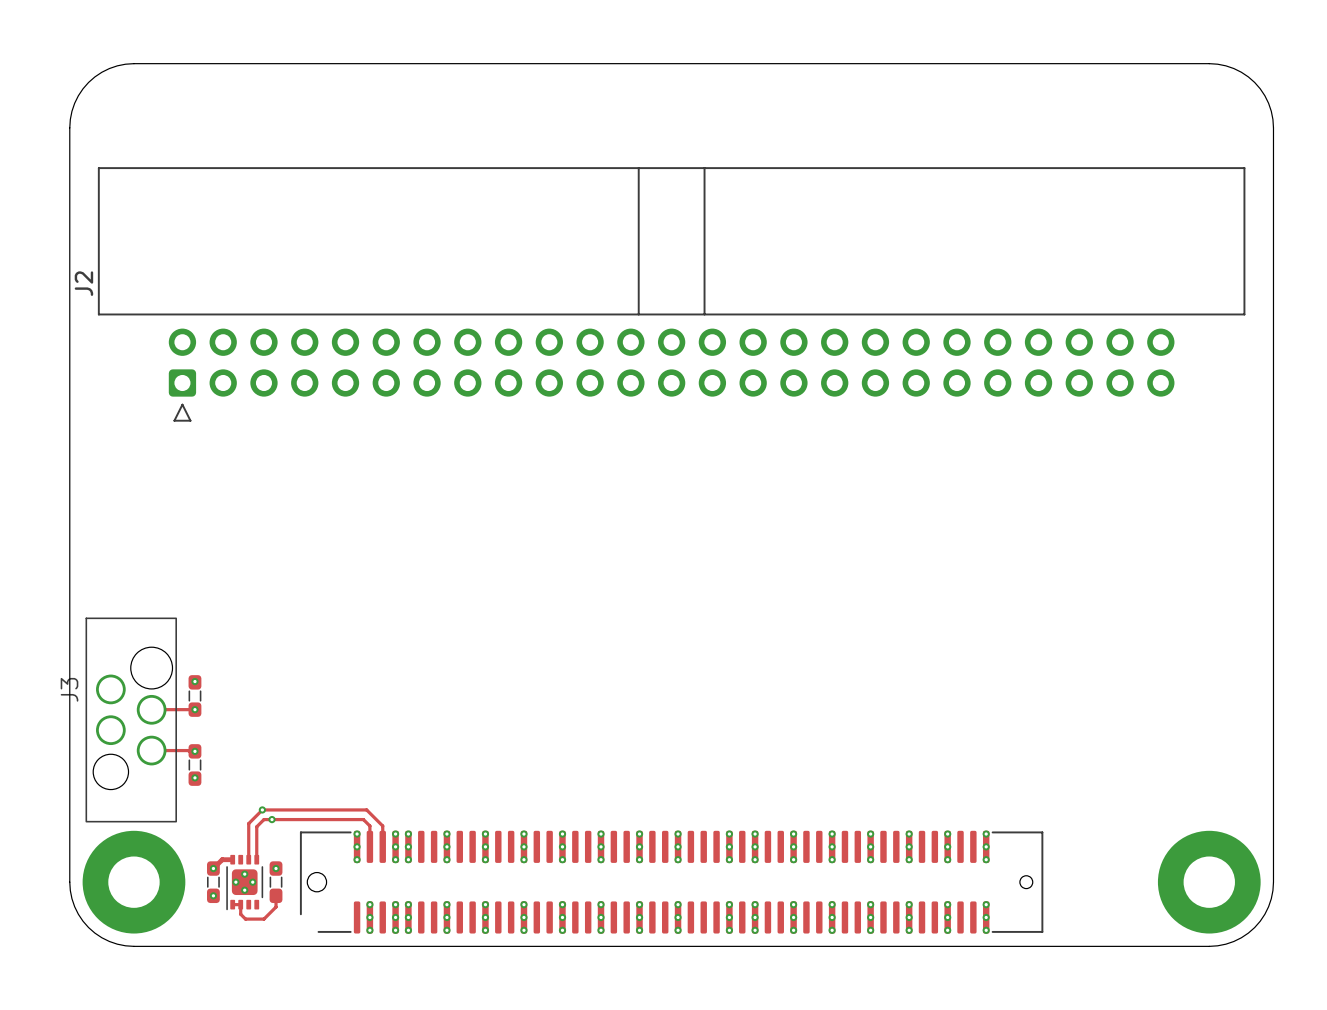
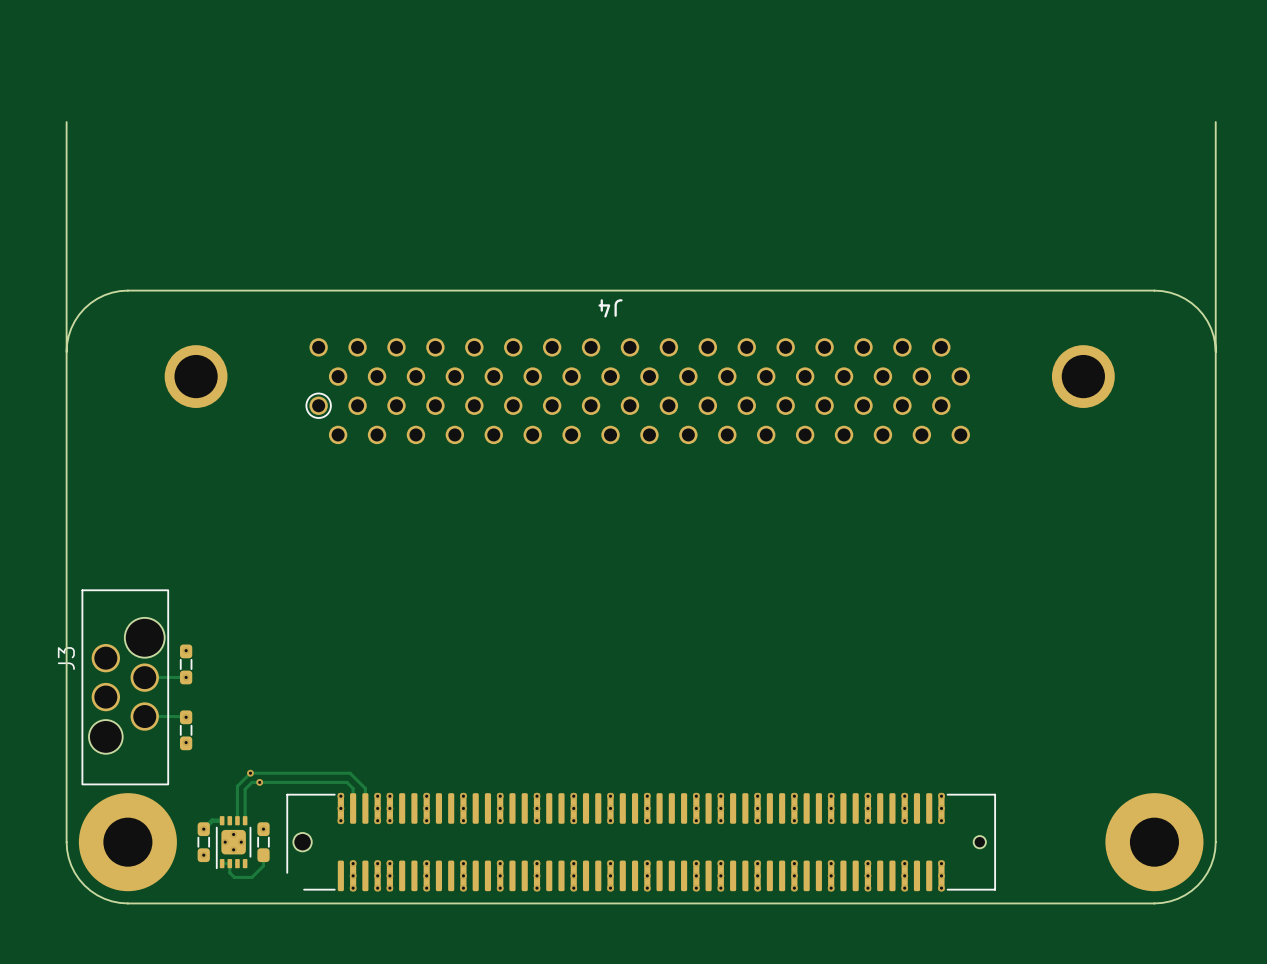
board edge: (69, 127) (74, 103) (88, 82) (109, 68) (133, 63) (1209, 63) (1233, 68) (1254, 82) (1268, 103) (1273, 127) -> (66, 351) (71, 328) (84, 308) (104, 295) (127, 290) (1154, 290) (1177, 295) (1197, 308) (1211, 328) (1215, 351)
J2: (671, 294) -> none
J4: none -> (639, 391)

